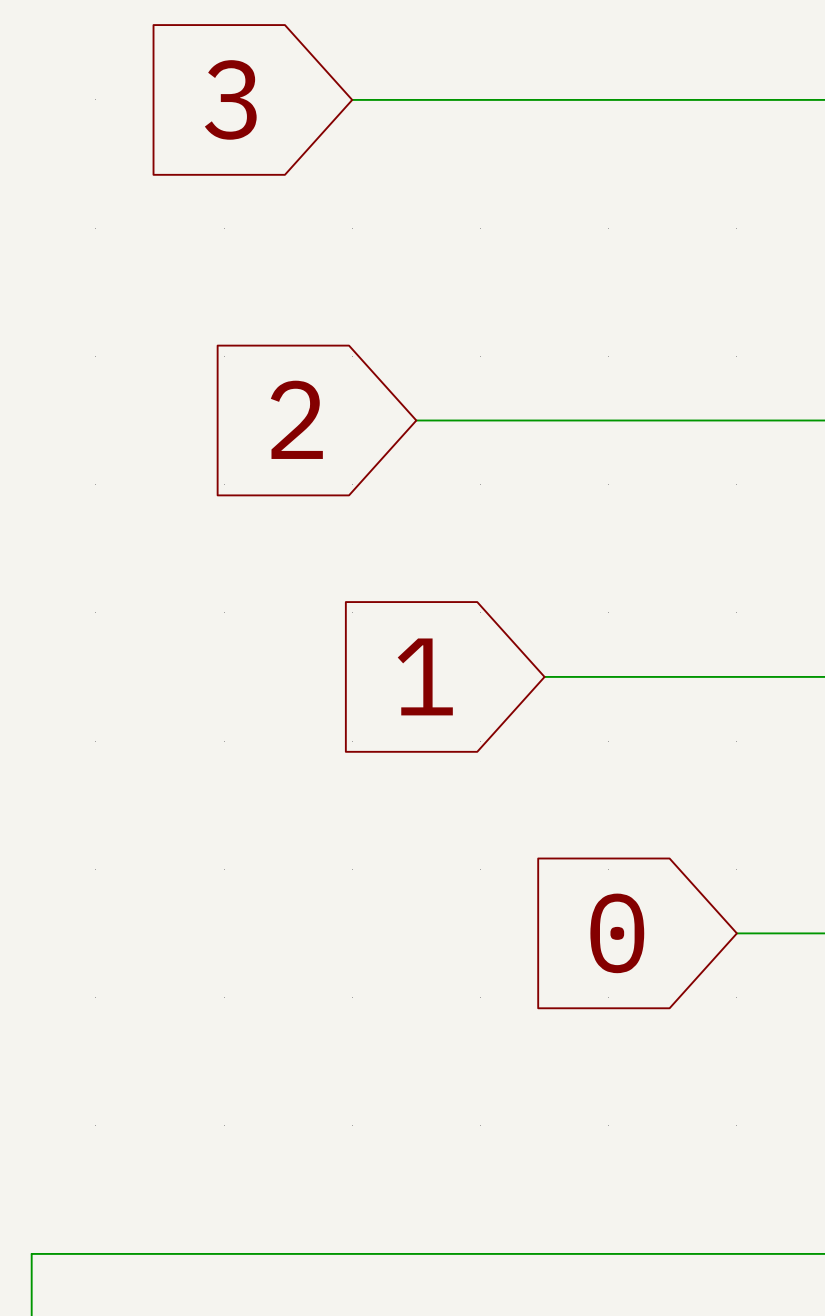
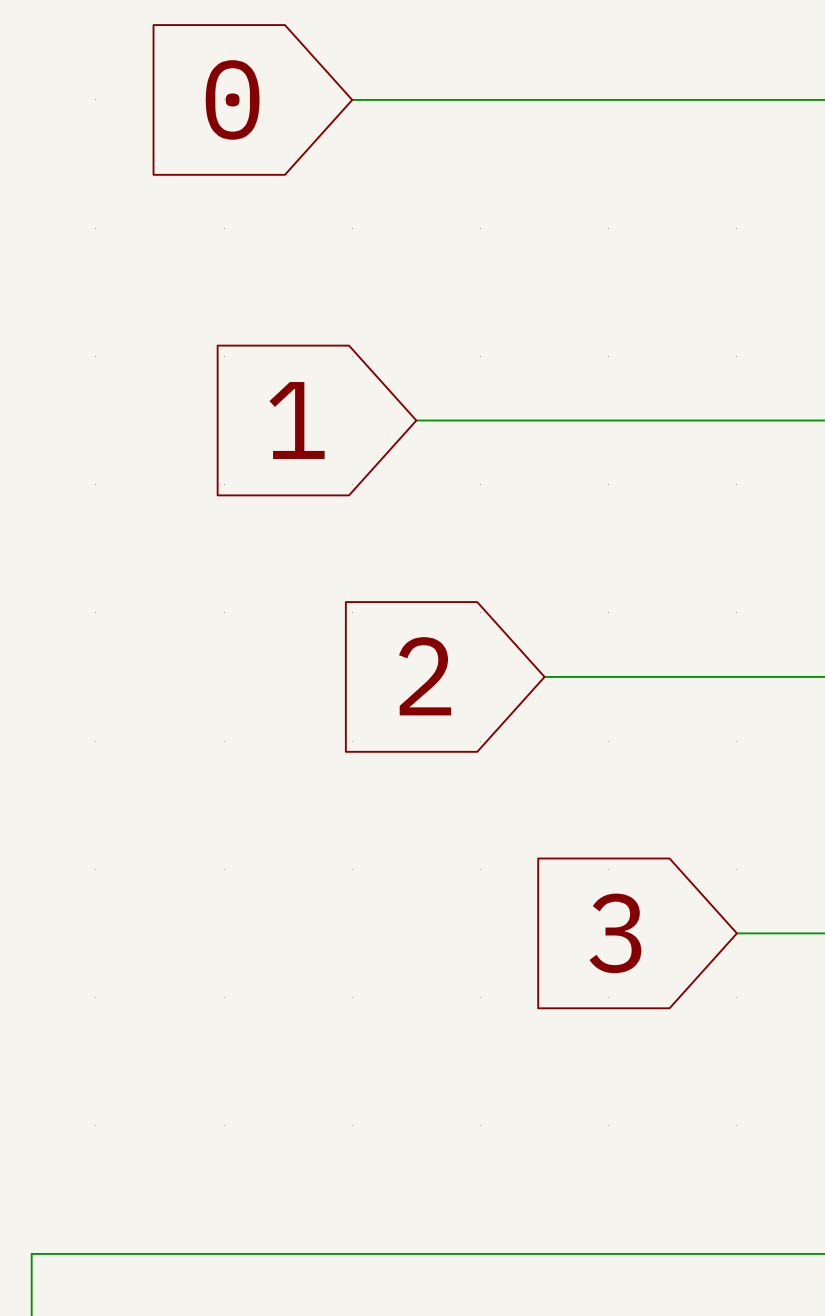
global label: 3 (230, 99) -> 0 (232, 99)
global label: 2 (296, 419) -> 1 (297, 420)
global label: 1 (425, 676) -> 2 (425, 676)
global label: 0 (617, 933) -> 3 (615, 933)

